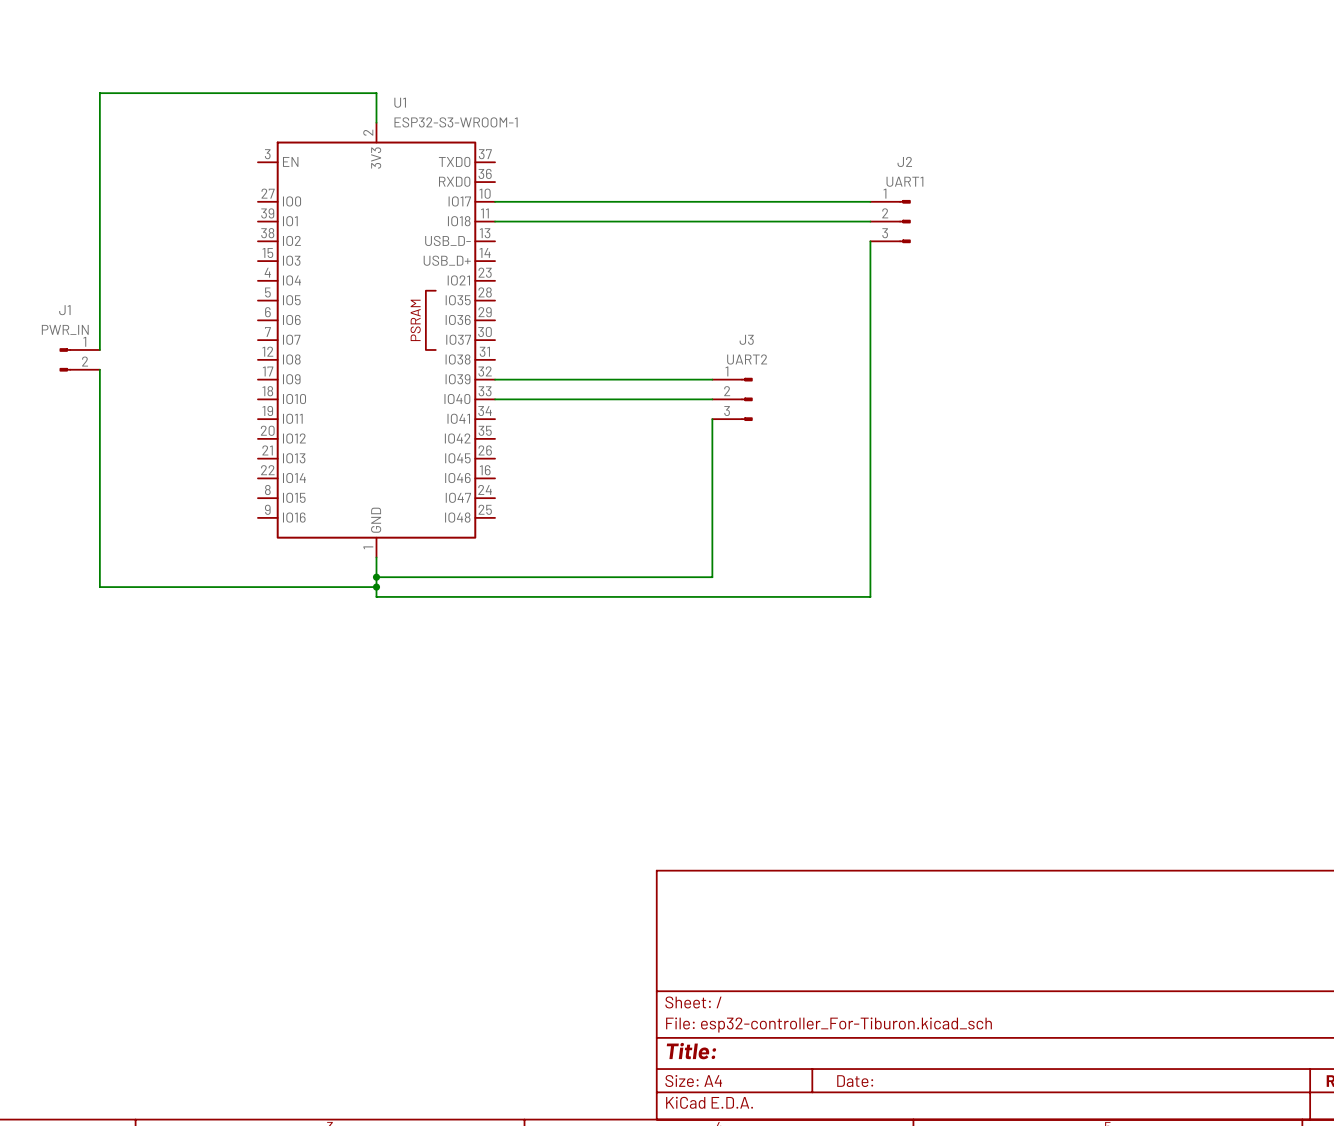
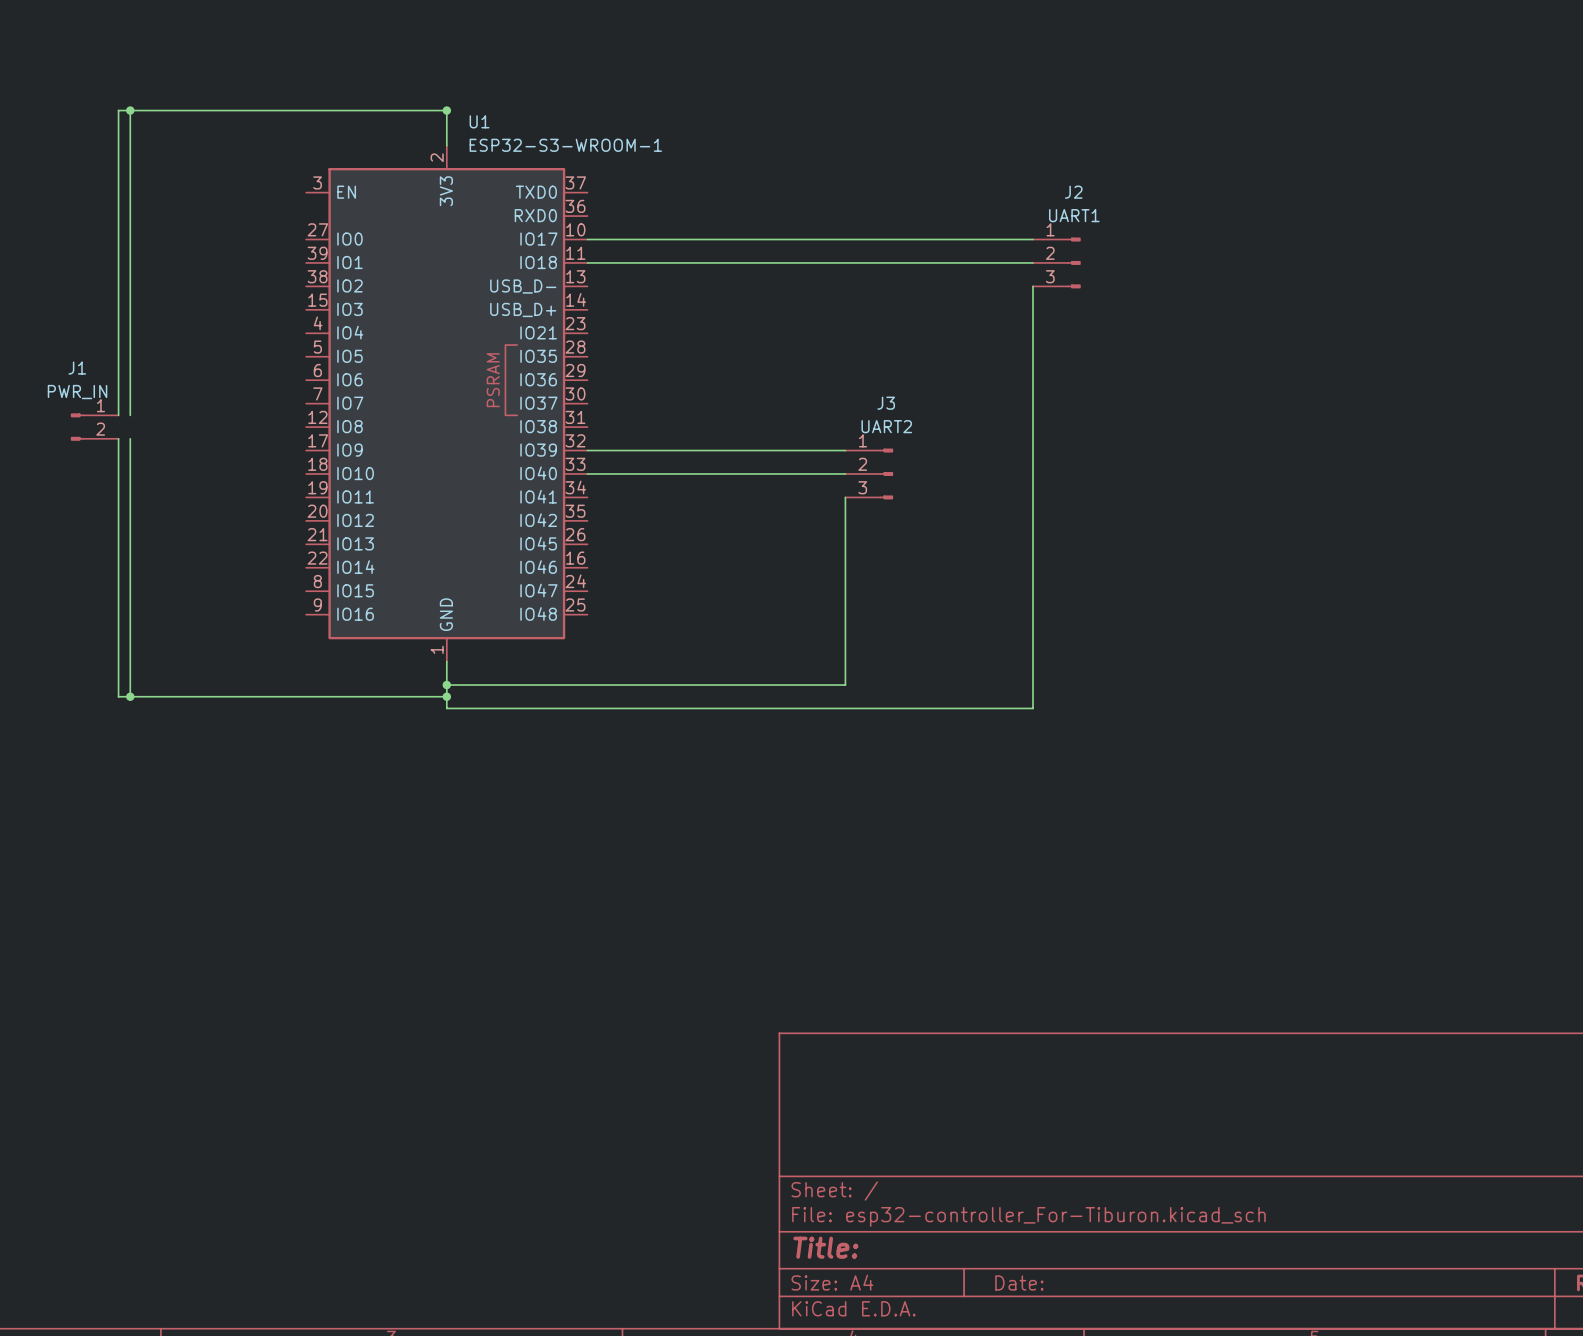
wire: none -> (130, 110) (130, 415)
junction: none -> (130, 110)
junction: none -> (446, 110)
wire: none -> (130, 438) (130, 696)
junction: none -> (130, 696)

